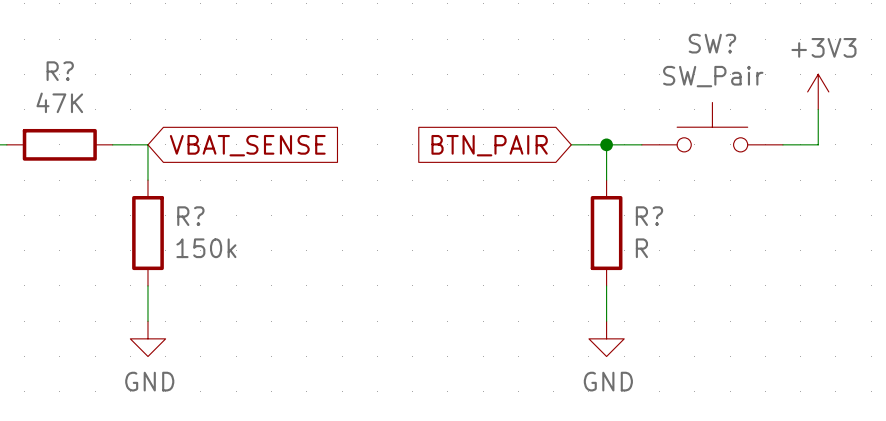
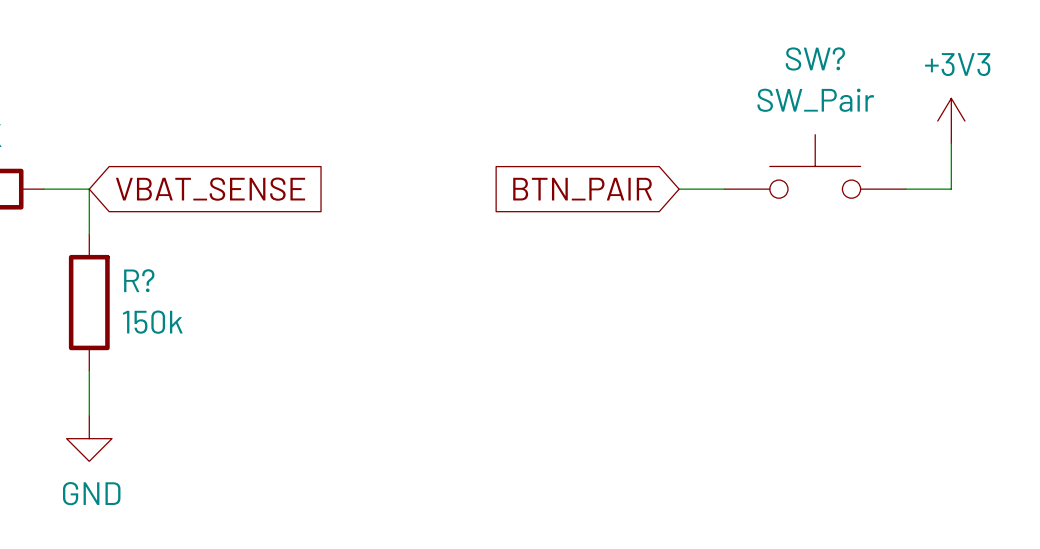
wire: (571, 144) (606, 144) (606, 180) -> none
junction: (606, 144) -> none
global label position: BTN_PAIR (489, 145) -> BTN_PAIR (582, 189)
R?: R (606, 233) -> none
wire: (606, 285) (606, 321) -> none
power symbol: GND (606, 338) -> none

